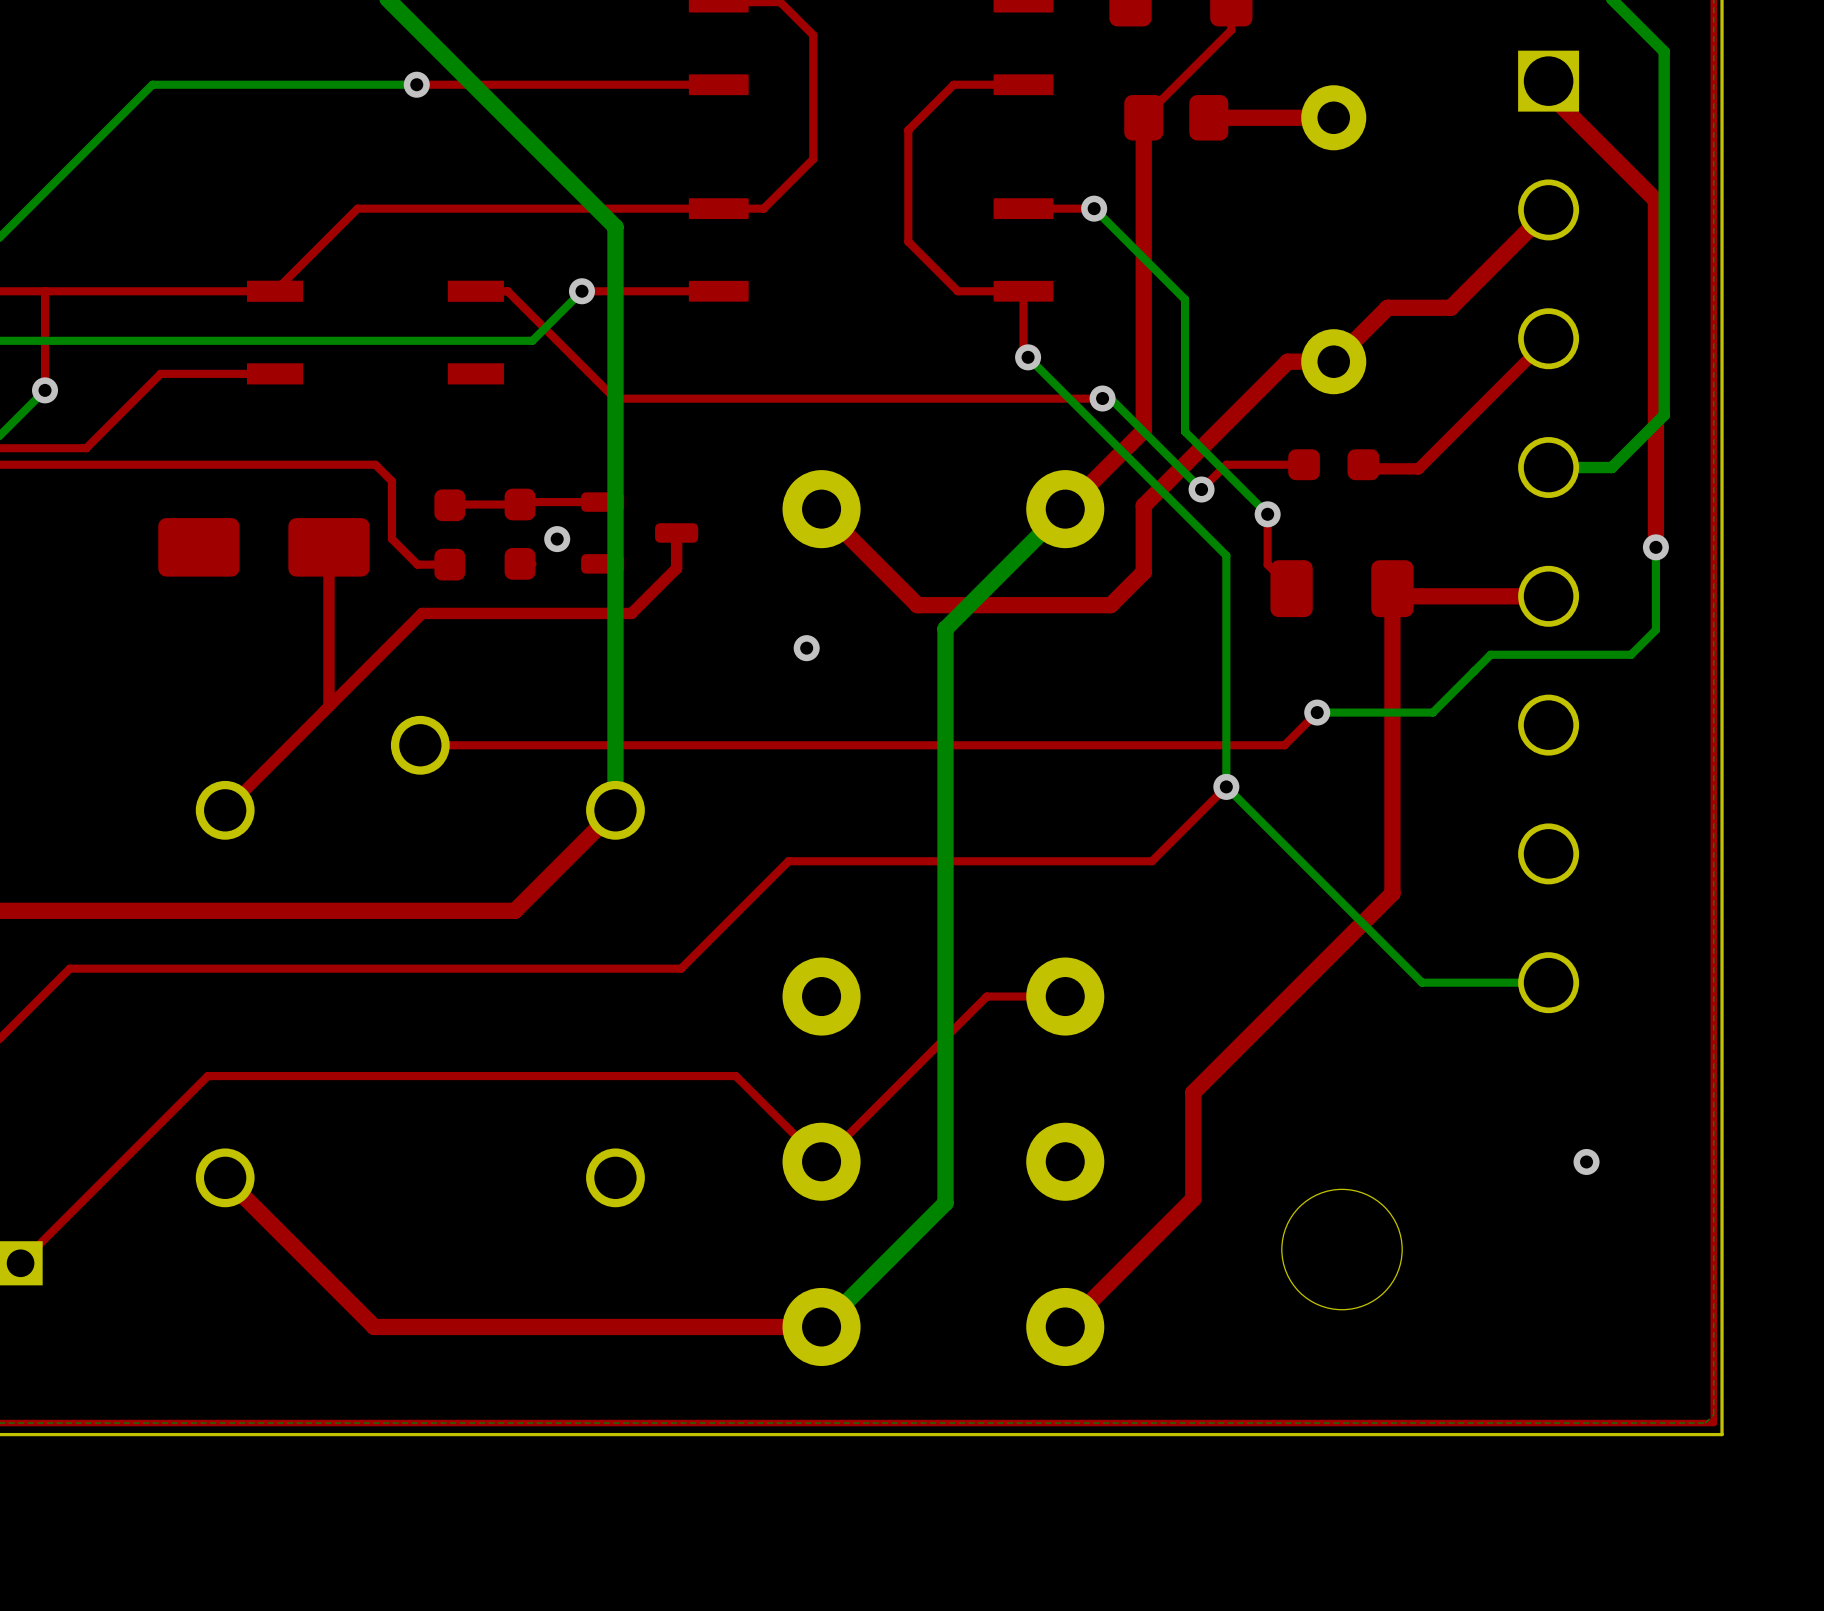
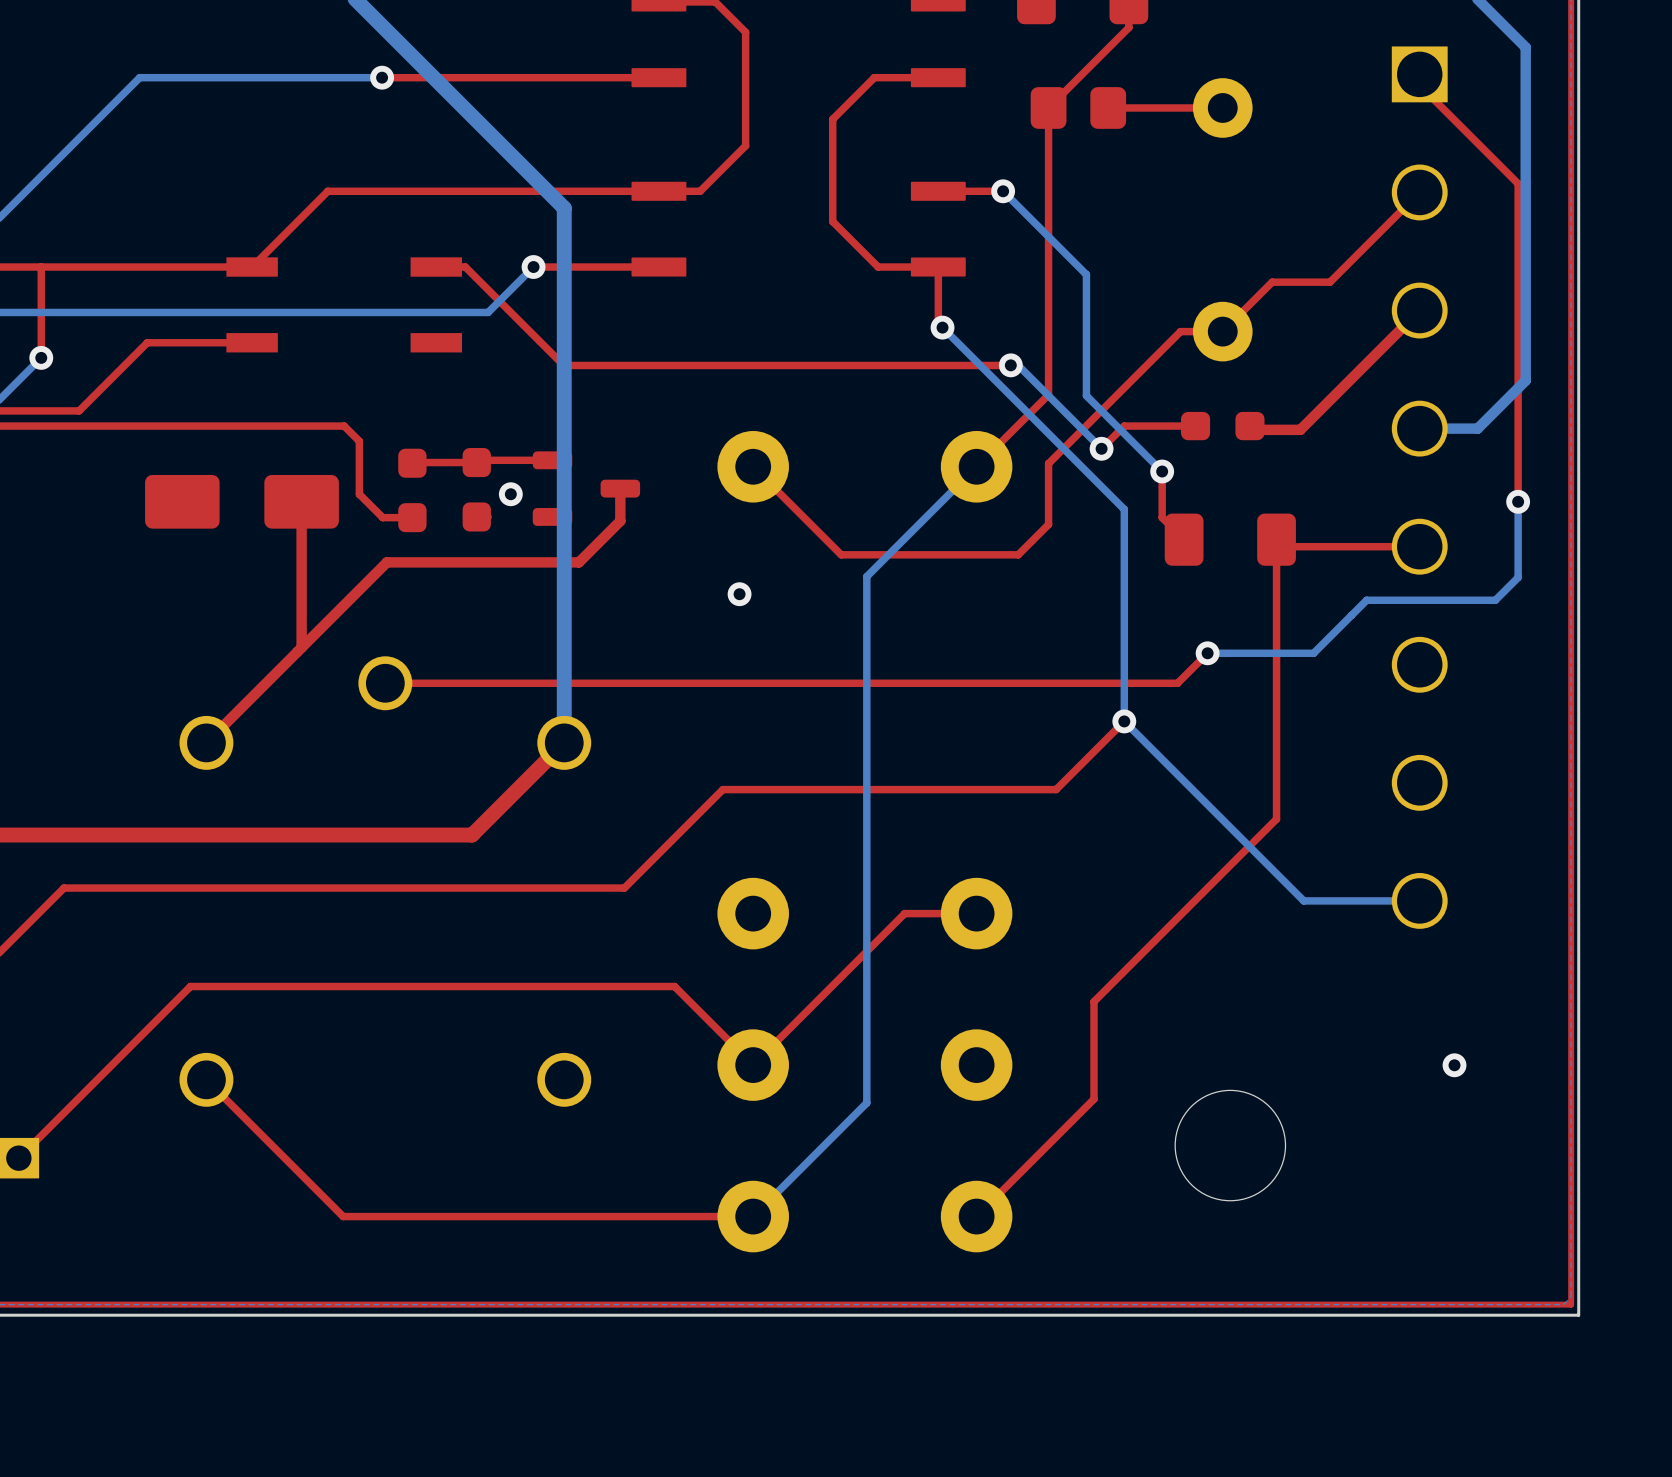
top track width: thick (1548, 93) (1655, 200) (1655, 547) -> thin (1419, 85) (1518, 183) (1518, 501)
top track width: thick (1143, 117) (1143, 430) (1065, 509) -> thin (1048, 107) (1048, 394) (976, 466)
top track width: thick (1333, 117) (1208, 117) -> thin (1222, 107) (1108, 107)
top track width: thick (1548, 209) (1450, 307) (1387, 307) (1333, 361) (1287, 361) (1143, 505) (1143, 572) (1110, 605) (917, 605) (821, 509) -> thin (1419, 192) (1330, 282) (1272, 282) (1222, 331) (1180, 331) (1048, 463) (1048, 524) (1018, 554) (841, 554) (753, 466)
bottom track width: thick (1065, 509) (945, 628) (945, 1203) (821, 1326) -> thin (976, 466) (866, 576) (866, 1102) (753, 1216)
top track width: thick (1392, 588) (1392, 893) (1193, 1092) (1193, 1198) (1065, 1326) -> thin (1276, 539) (1276, 819) (1094, 1001) (1094, 1099) (976, 1216)
top track width: thick (1548, 596) (1400, 596) -> thin (1419, 546) (1283, 546)
top track width: thick (225, 1177) (374, 1326) (821, 1326) -> thin (206, 1079) (343, 1216) (753, 1216)

